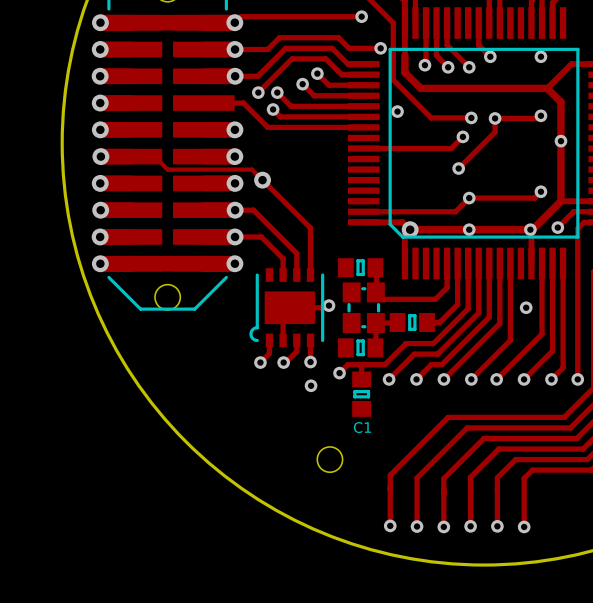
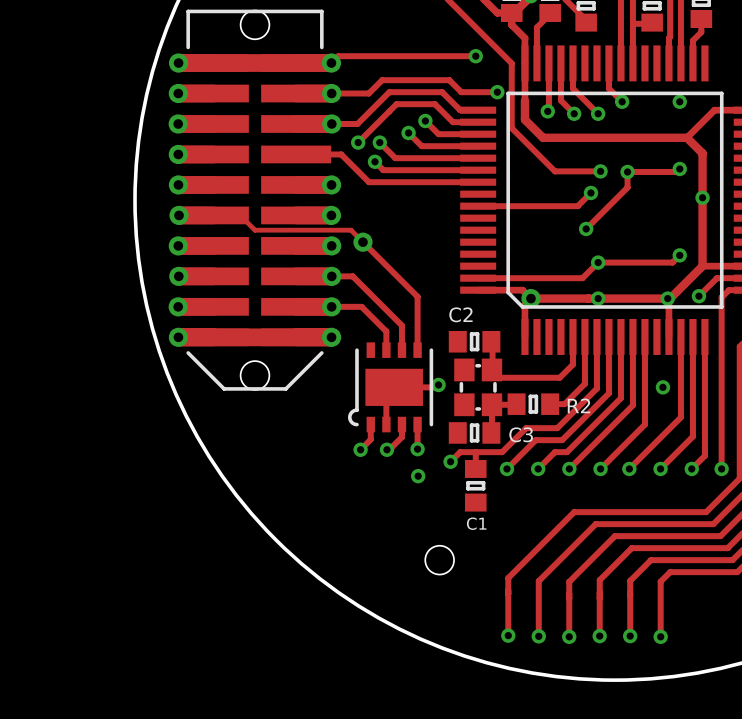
via: (397, 111) -> none
text: none -> C2 (460, 314)
text: none -> R2 (578, 405)
text: none -> C3 (521, 434)

